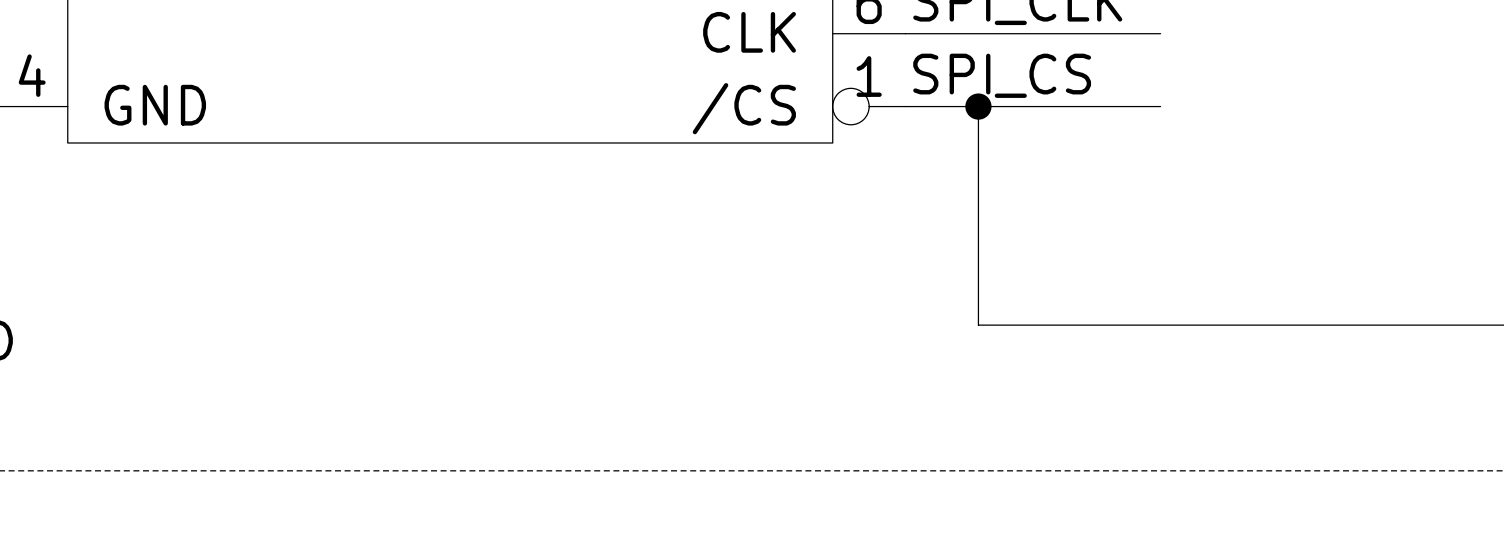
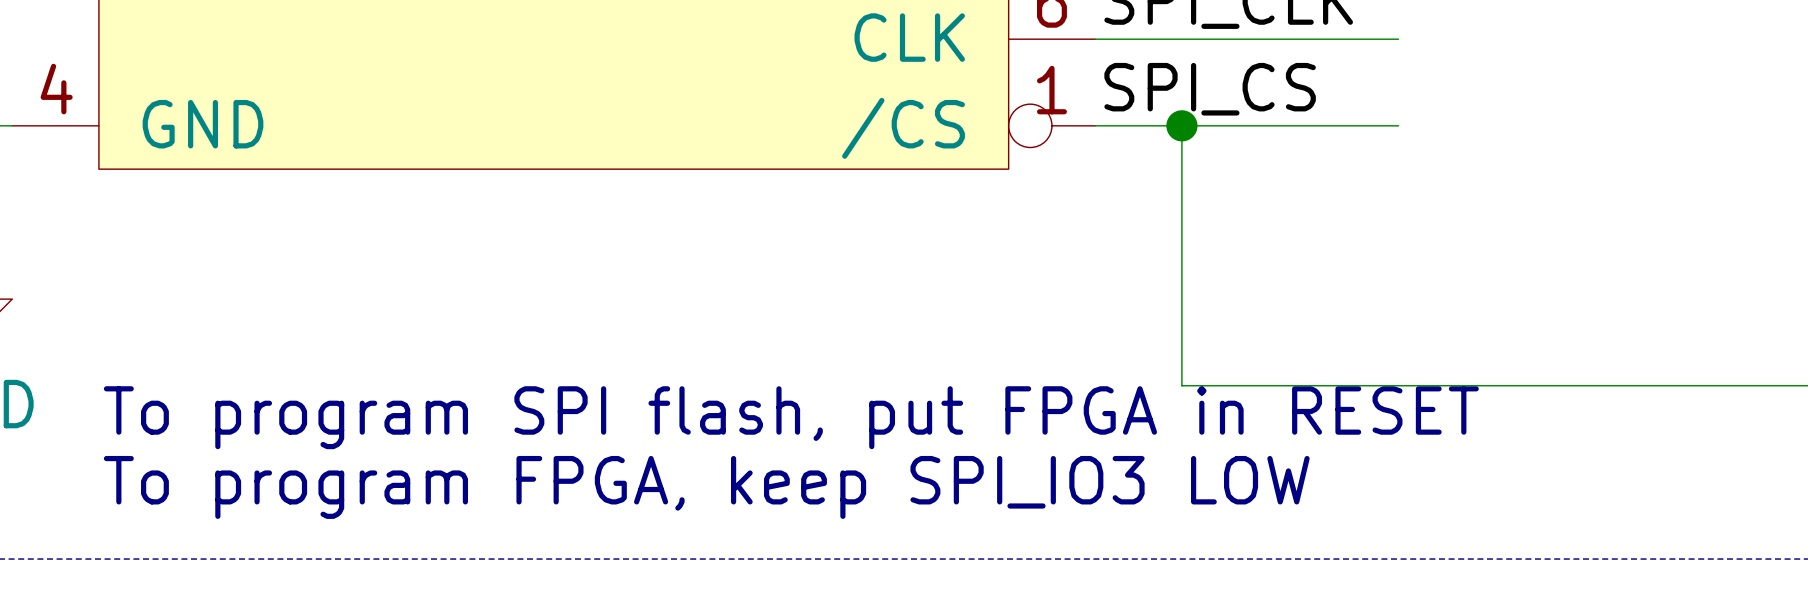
text: none -> To program SPI flash, put FPGA in RESET (791, 417)
text: none -> To program FPGA, keep SPI_IO3 LOW (706, 487)

